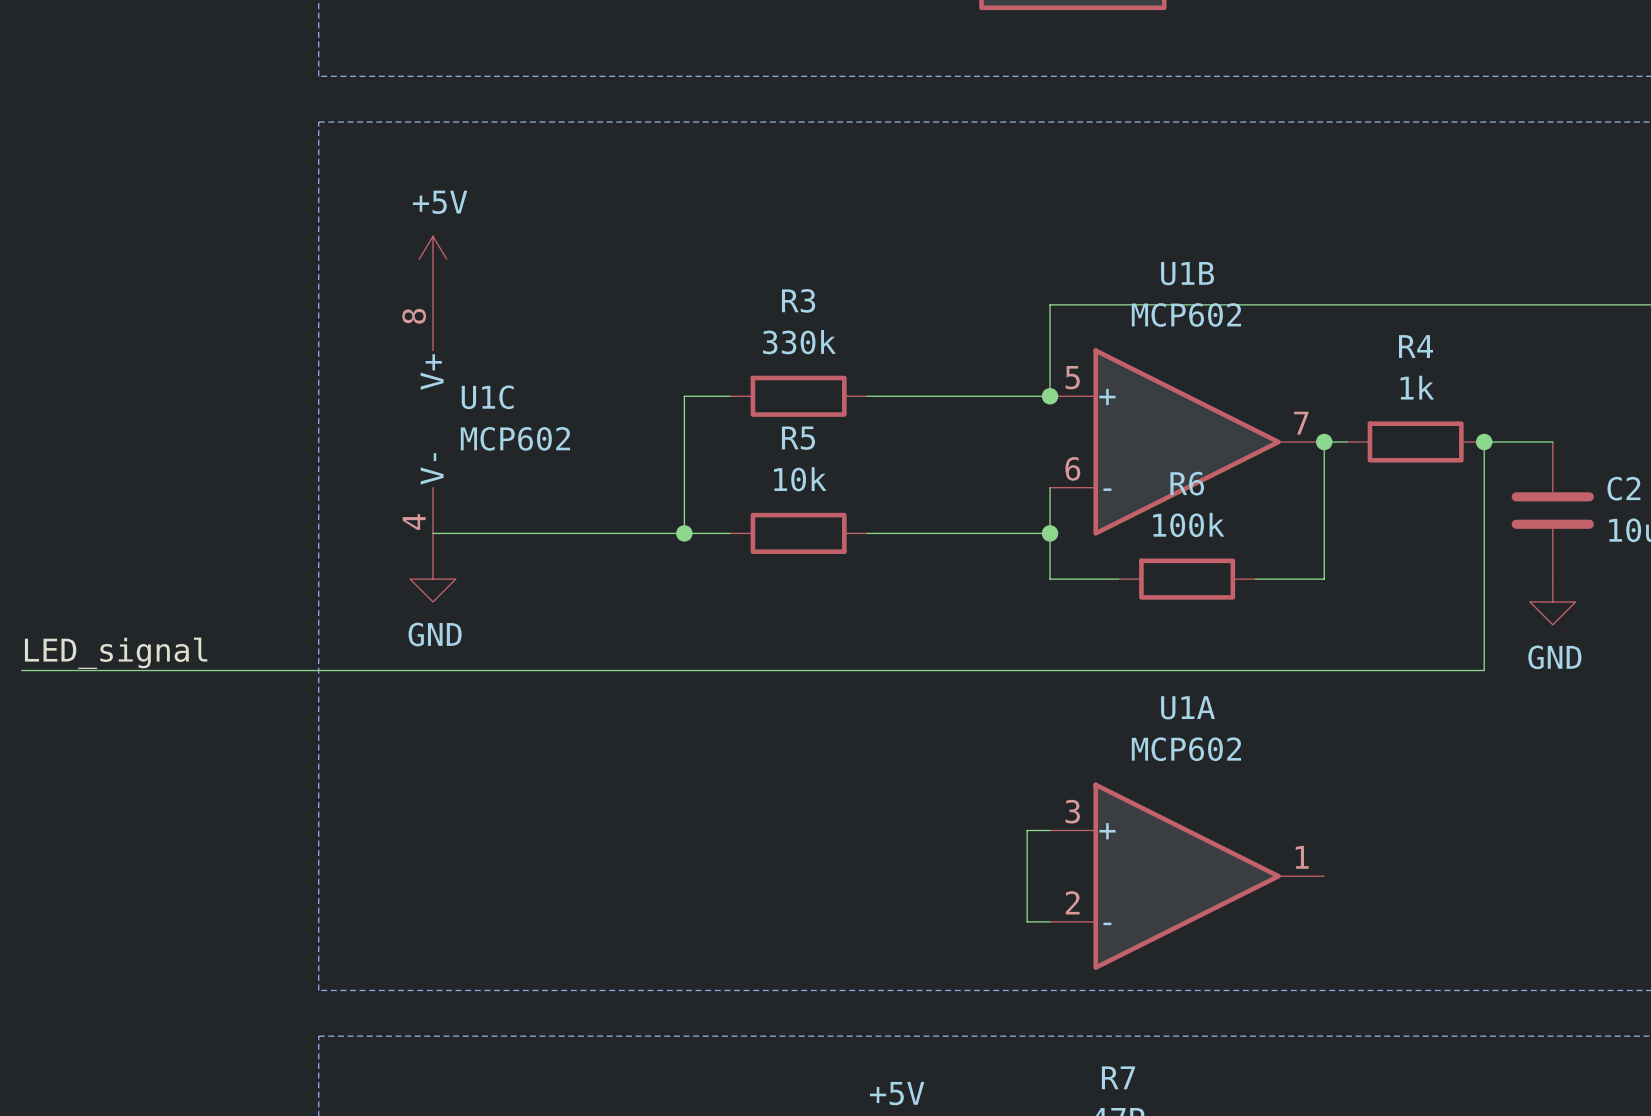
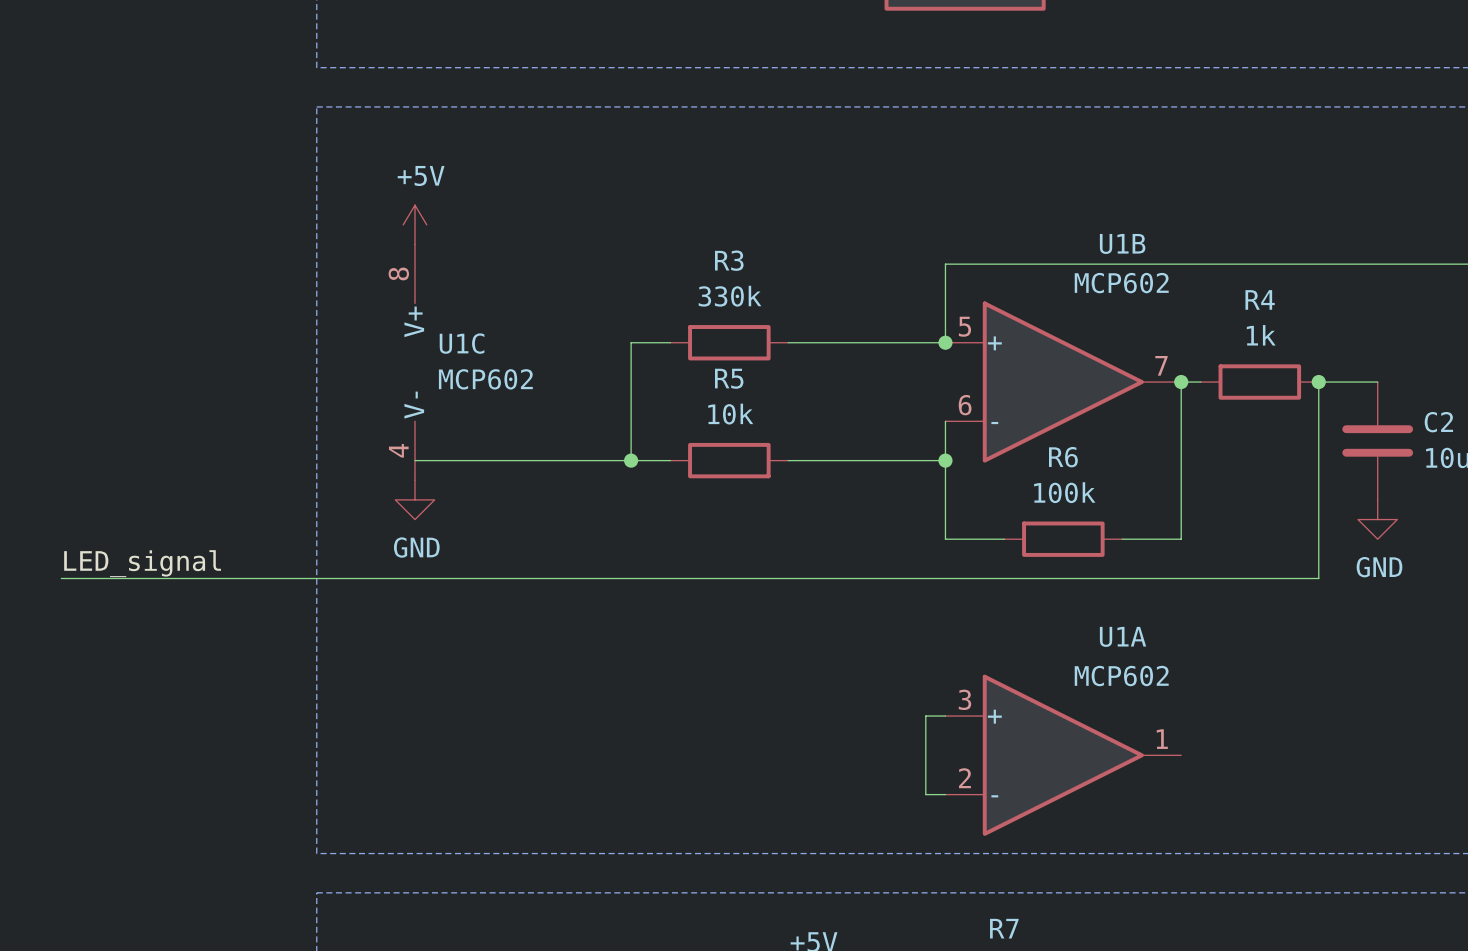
U1B name position: U1B (1187, 273) -> U1B (1122, 243)
U1B value position: MCP602 (1186, 315) -> MCP602 (1121, 283)
wire: (1050, 579) (1118, 579) -> (945, 499) (945, 539) (1004, 539)
R6 position: (1187, 579) -> (1063, 539)
wire: (1255, 579) (1324, 579) -> (1122, 539) (1181, 539) (1181, 499)
U1A name position: U1A (1187, 707) -> U1A (1123, 636)
U1A value position: MCP602 (1186, 749) -> MCP602 (1121, 676)

